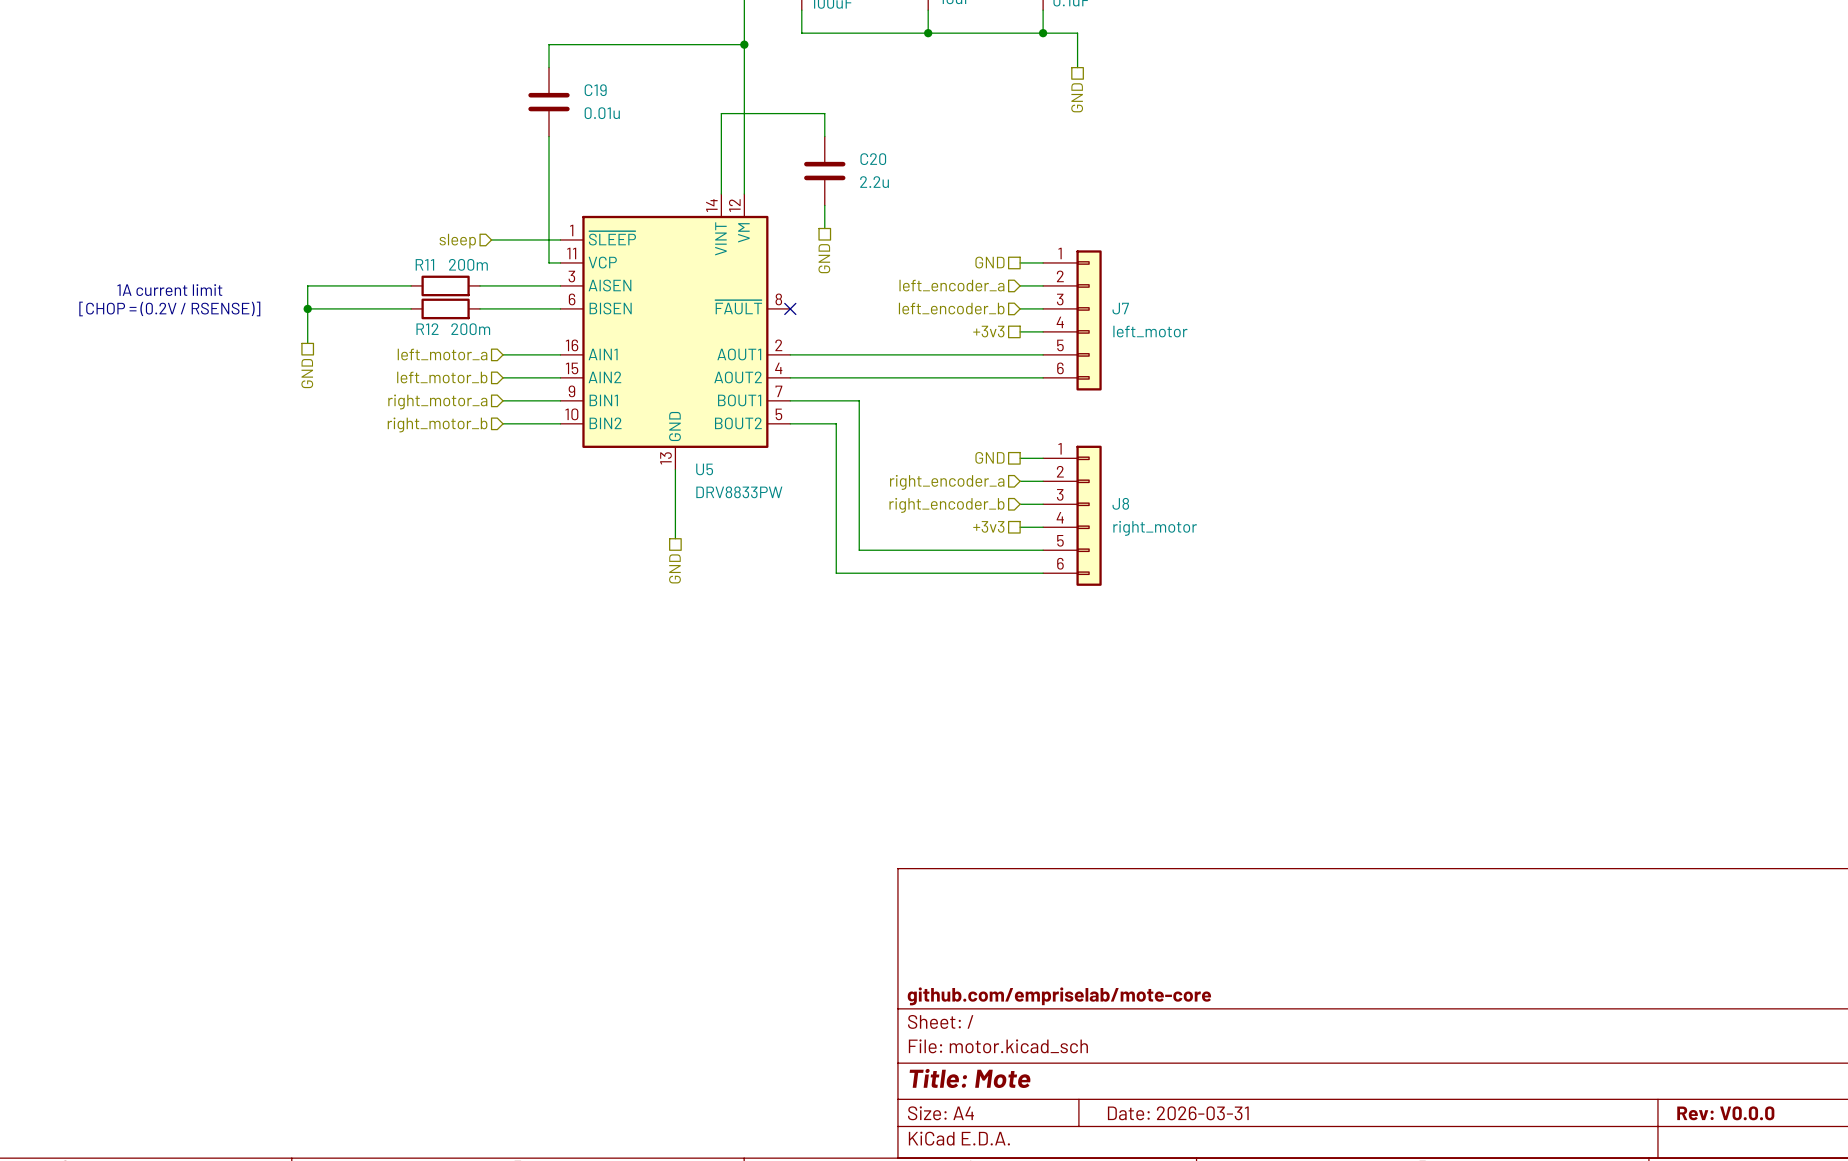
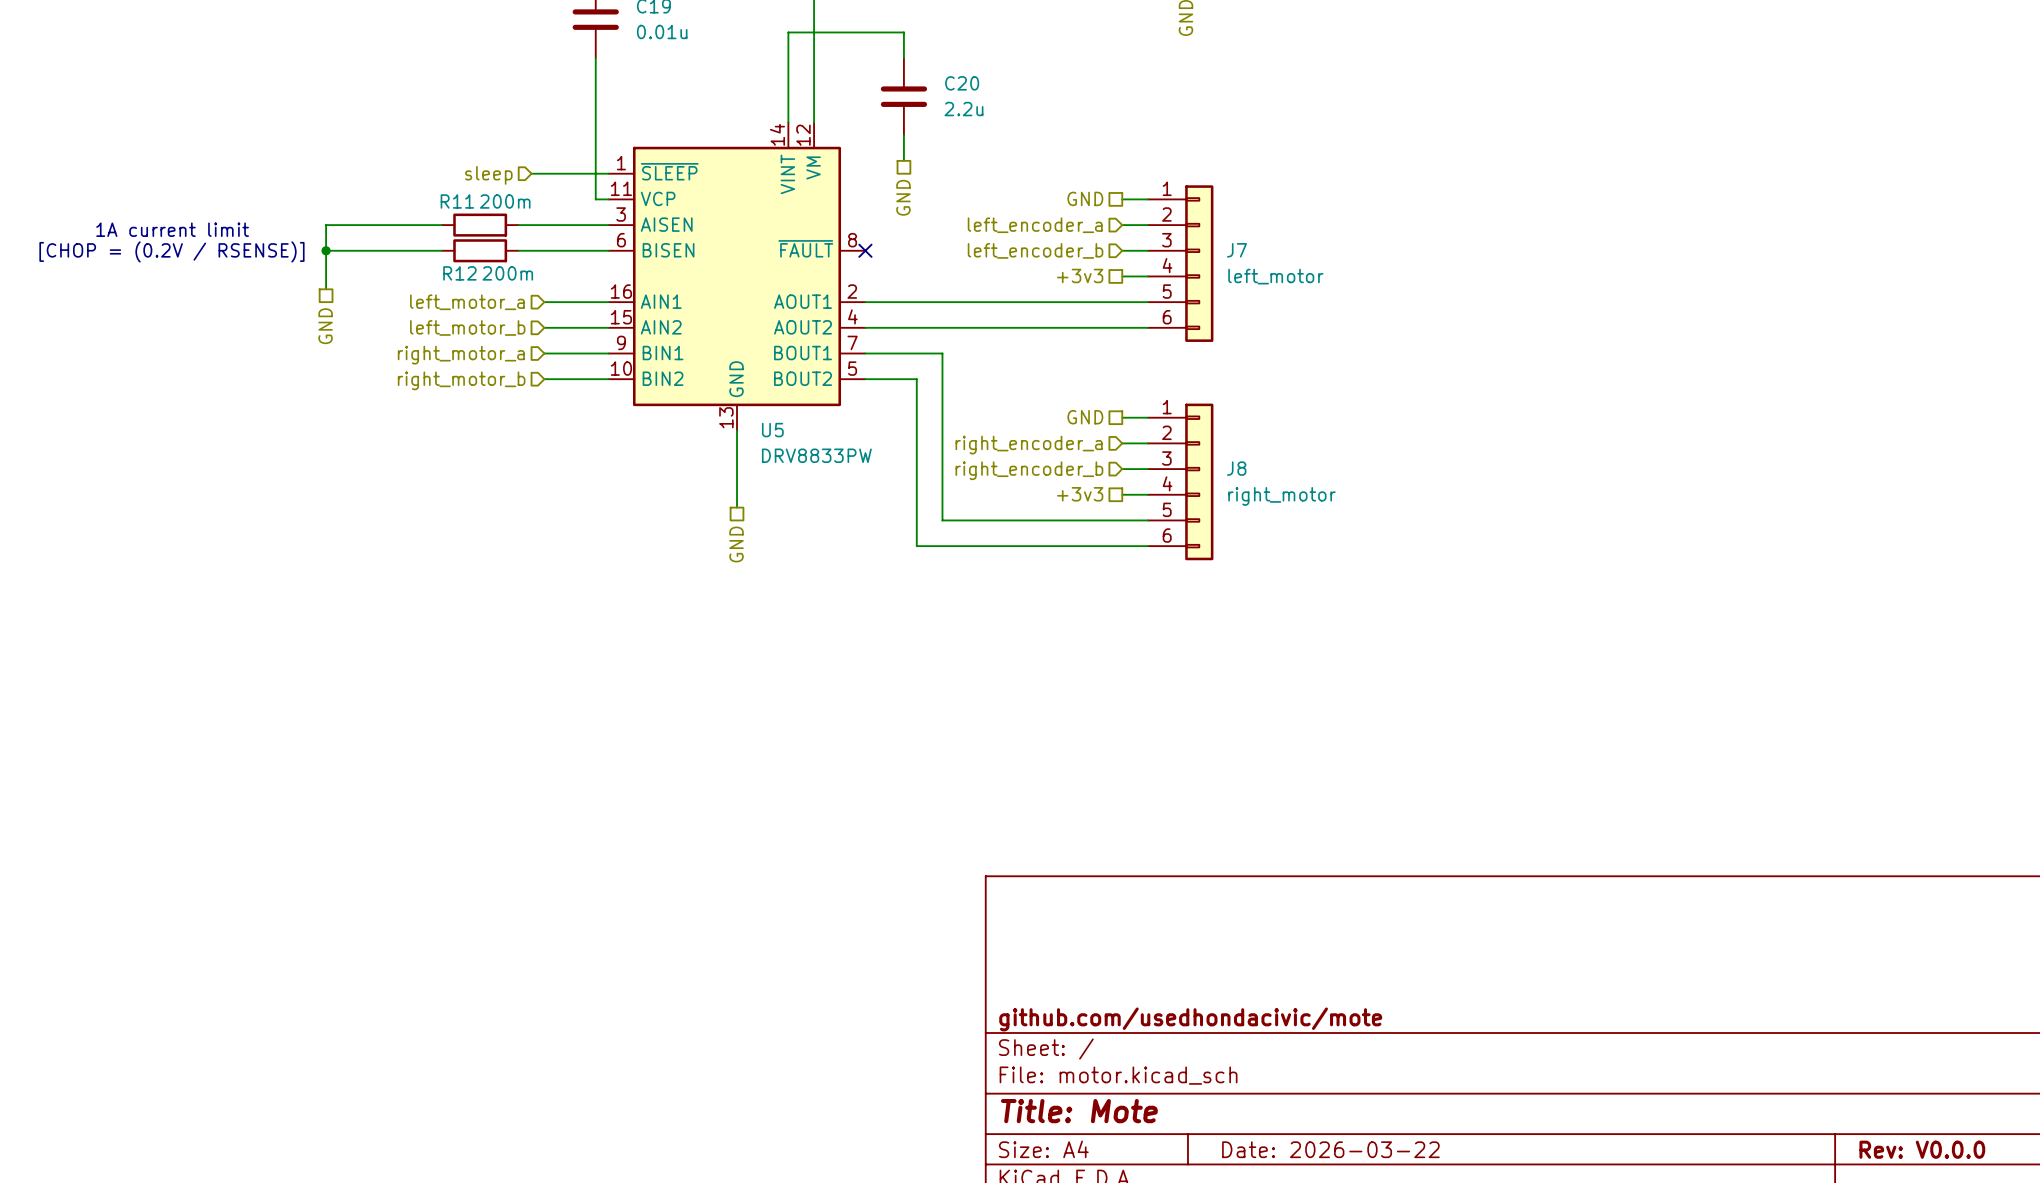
title block: github.com/empriselab/mote-core (1059, 996) -> github.com/usedhondacivic/mote (1190, 1019)
title block: Date: 2026-03-31 (1178, 1113) -> Date: 2026-03-22 (1330, 1149)

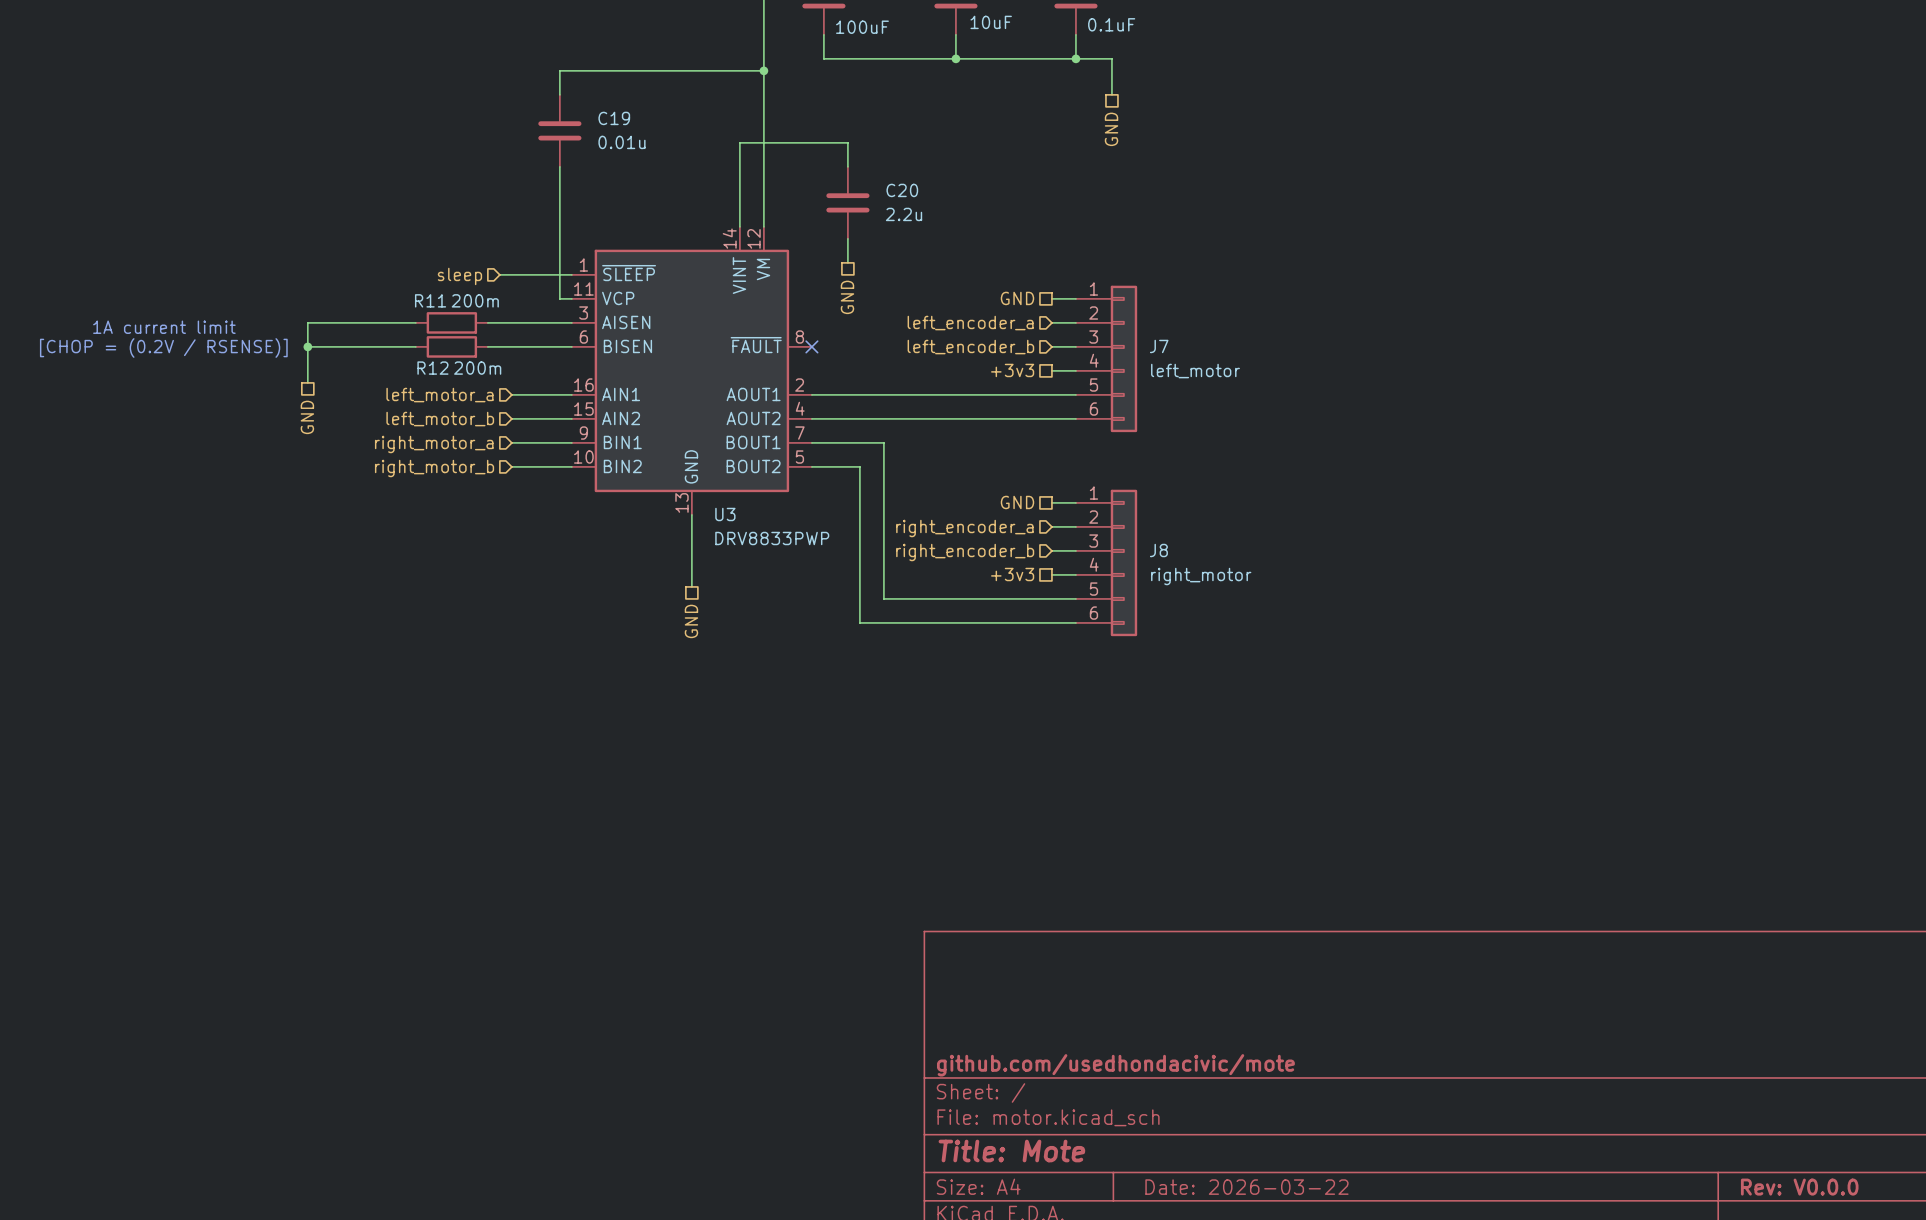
U5 name: U5 (772, 430) -> U3 (725, 514)
U5 value: DRV8833PW (816, 455) -> DRV8833PWP (772, 538)

